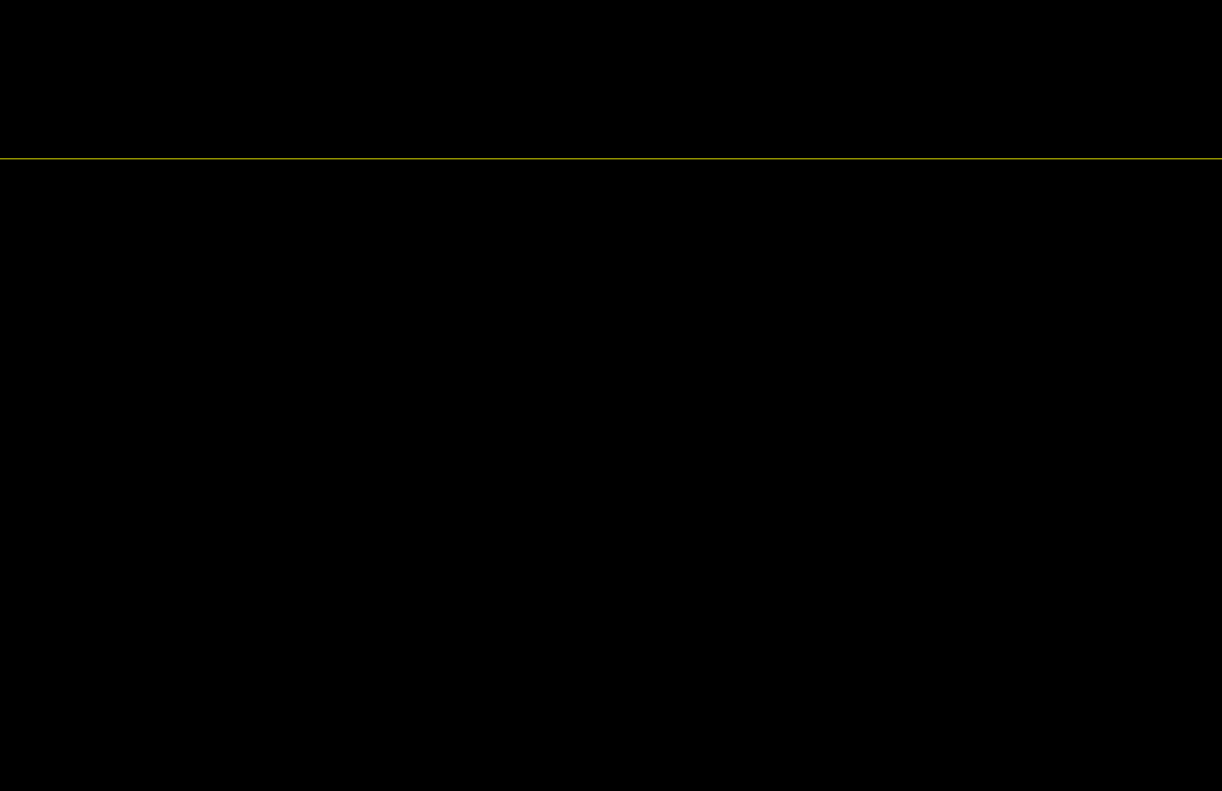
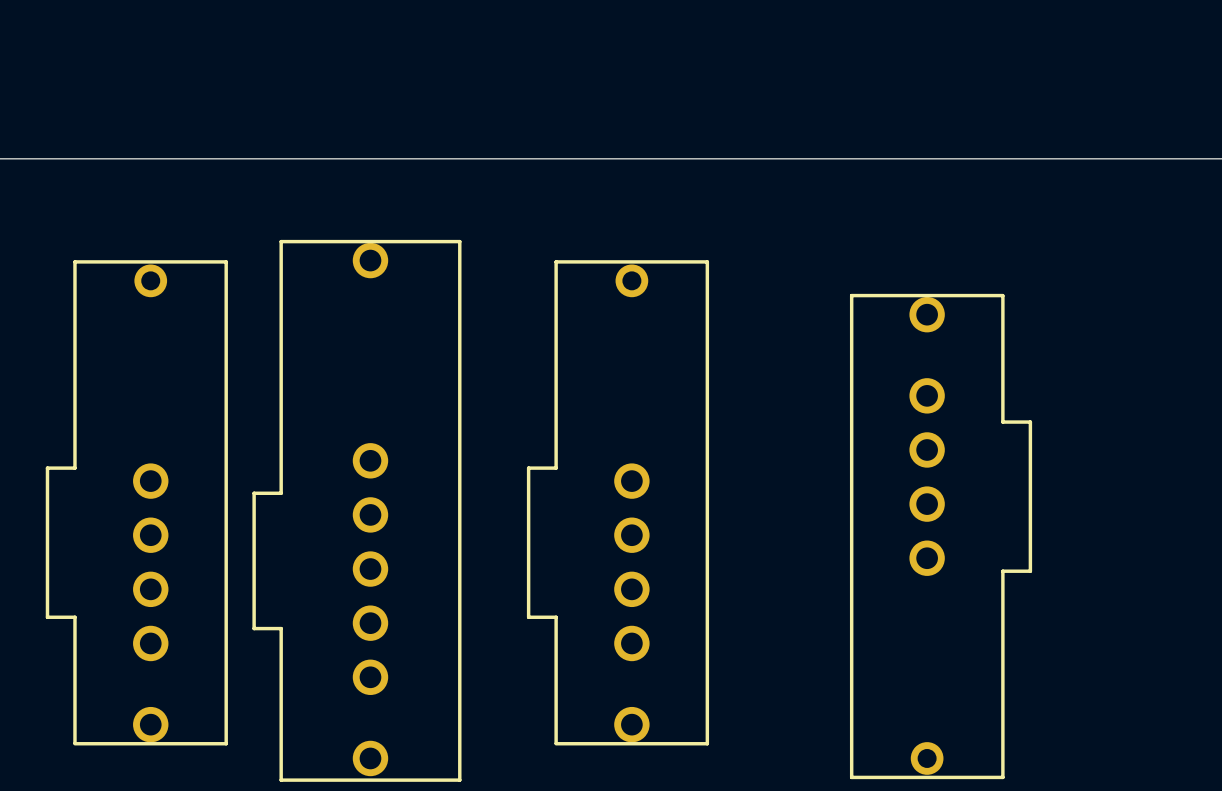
part: none -> (136, 502)
part: none -> (617, 502)
part: none -> (356, 510)
part: none -> (941, 536)

